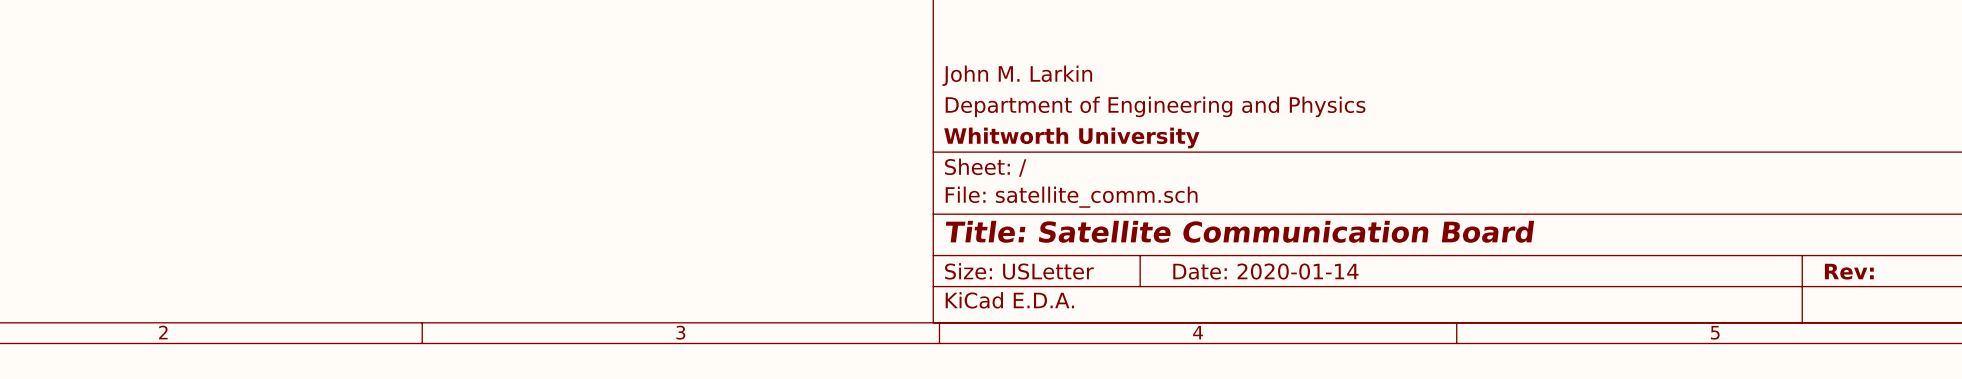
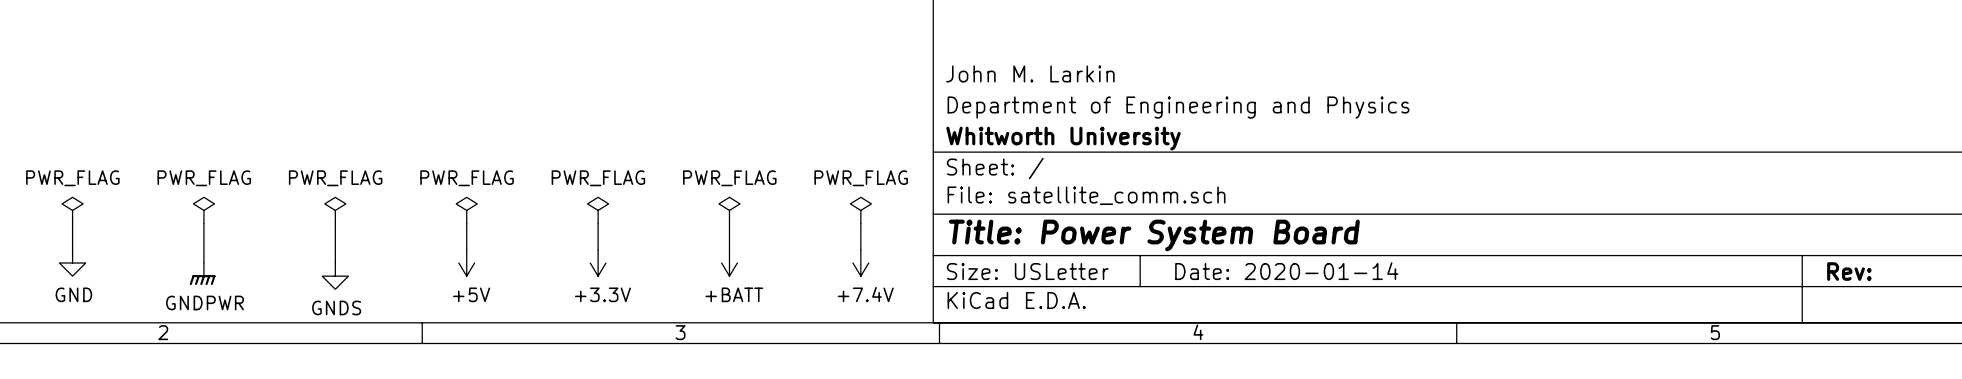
power symbol: none -> PWR_FLAG (72, 210)
power symbol: none -> PWR_FLAG (203, 210)
power symbol: none -> PWR_FLAG (335, 210)
power symbol: none -> PWR_FLAG (466, 210)
power symbol: none -> PWR_FLAG (598, 210)
power symbol: none -> PWR_FLAG (729, 210)
power symbol: none -> PWR_FLAG (860, 210)
wire: none -> (72, 223) (72, 249)
wire: none -> (203, 223) (203, 263)
wire: none -> (335, 223) (335, 263)
wire: none -> (466, 223) (466, 249)
wire: none -> (598, 223) (598, 249)
wire: none -> (729, 223) (729, 249)
wire: none -> (860, 223) (860, 249)
title block: Title: Satellite Communication Board (1239, 231) -> Title: Power System Board (1154, 235)
power symbol: none -> GND (72, 263)
power symbol: none -> +5V (466, 263)
power symbol: none -> +3.3V (598, 263)
power symbol: none -> +BATT (729, 263)
power symbol: none -> +7.4V (860, 263)
power symbol: none -> GNDPWR (202, 274)
power symbol: none -> GNDS (335, 276)

